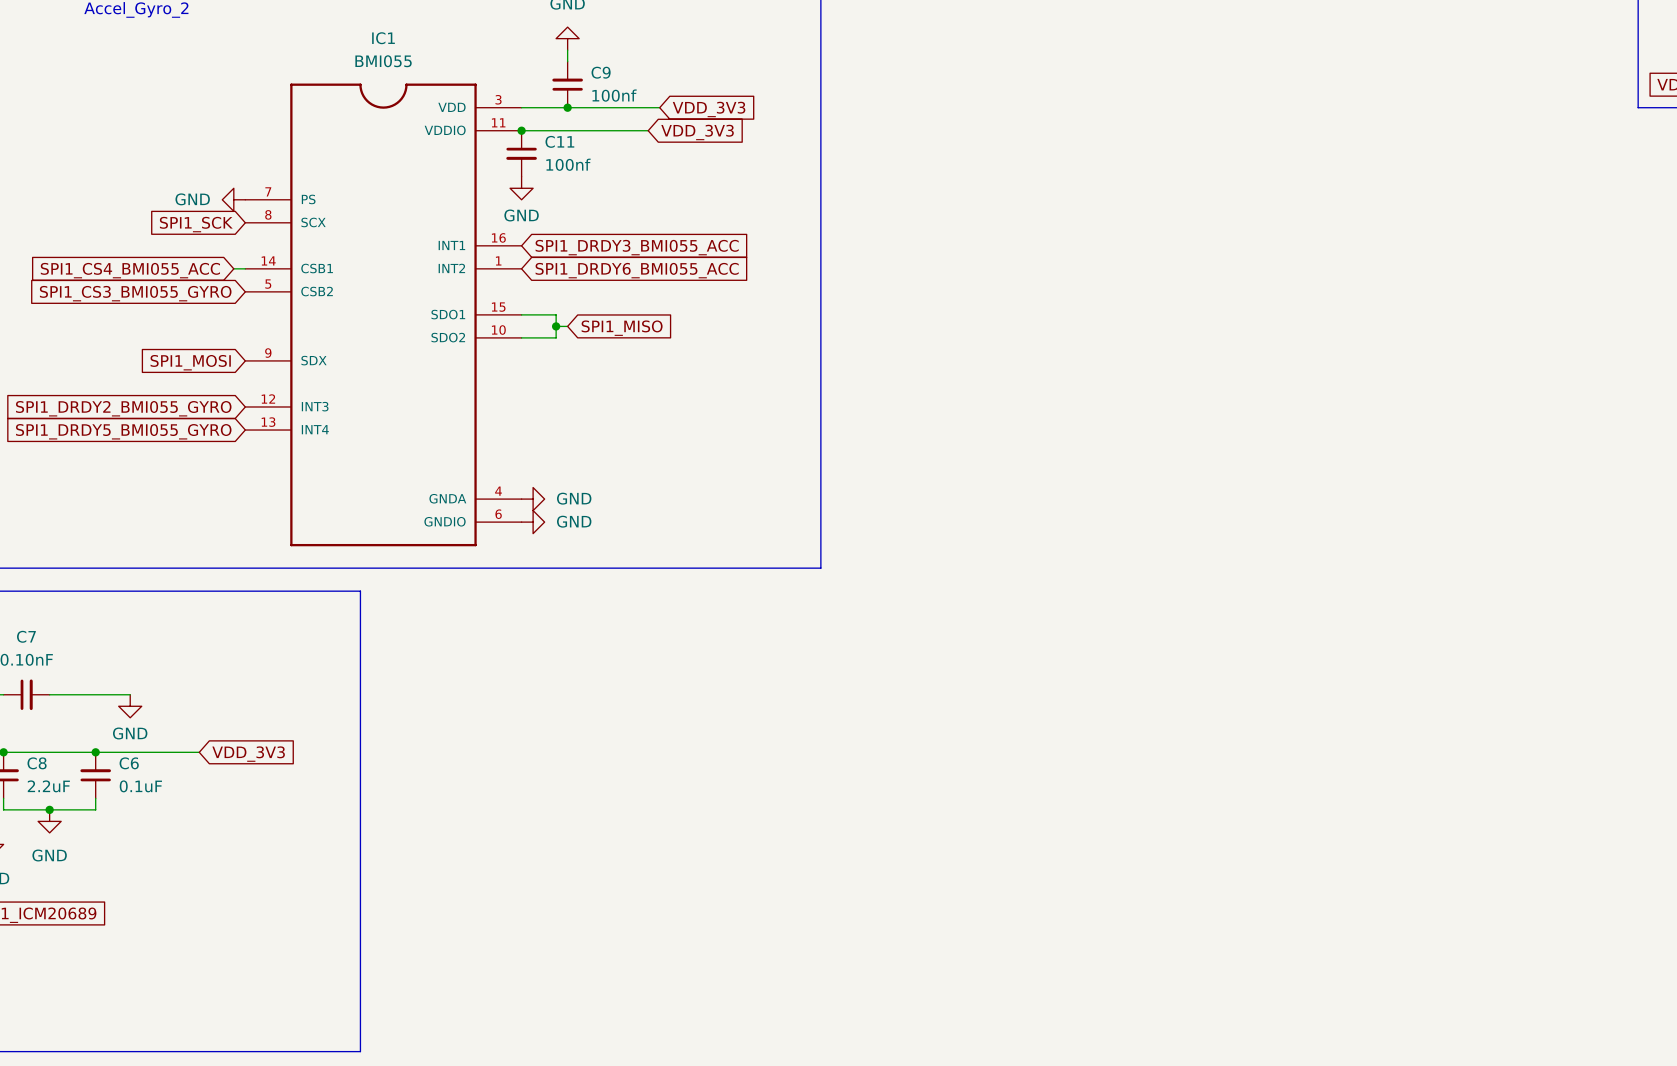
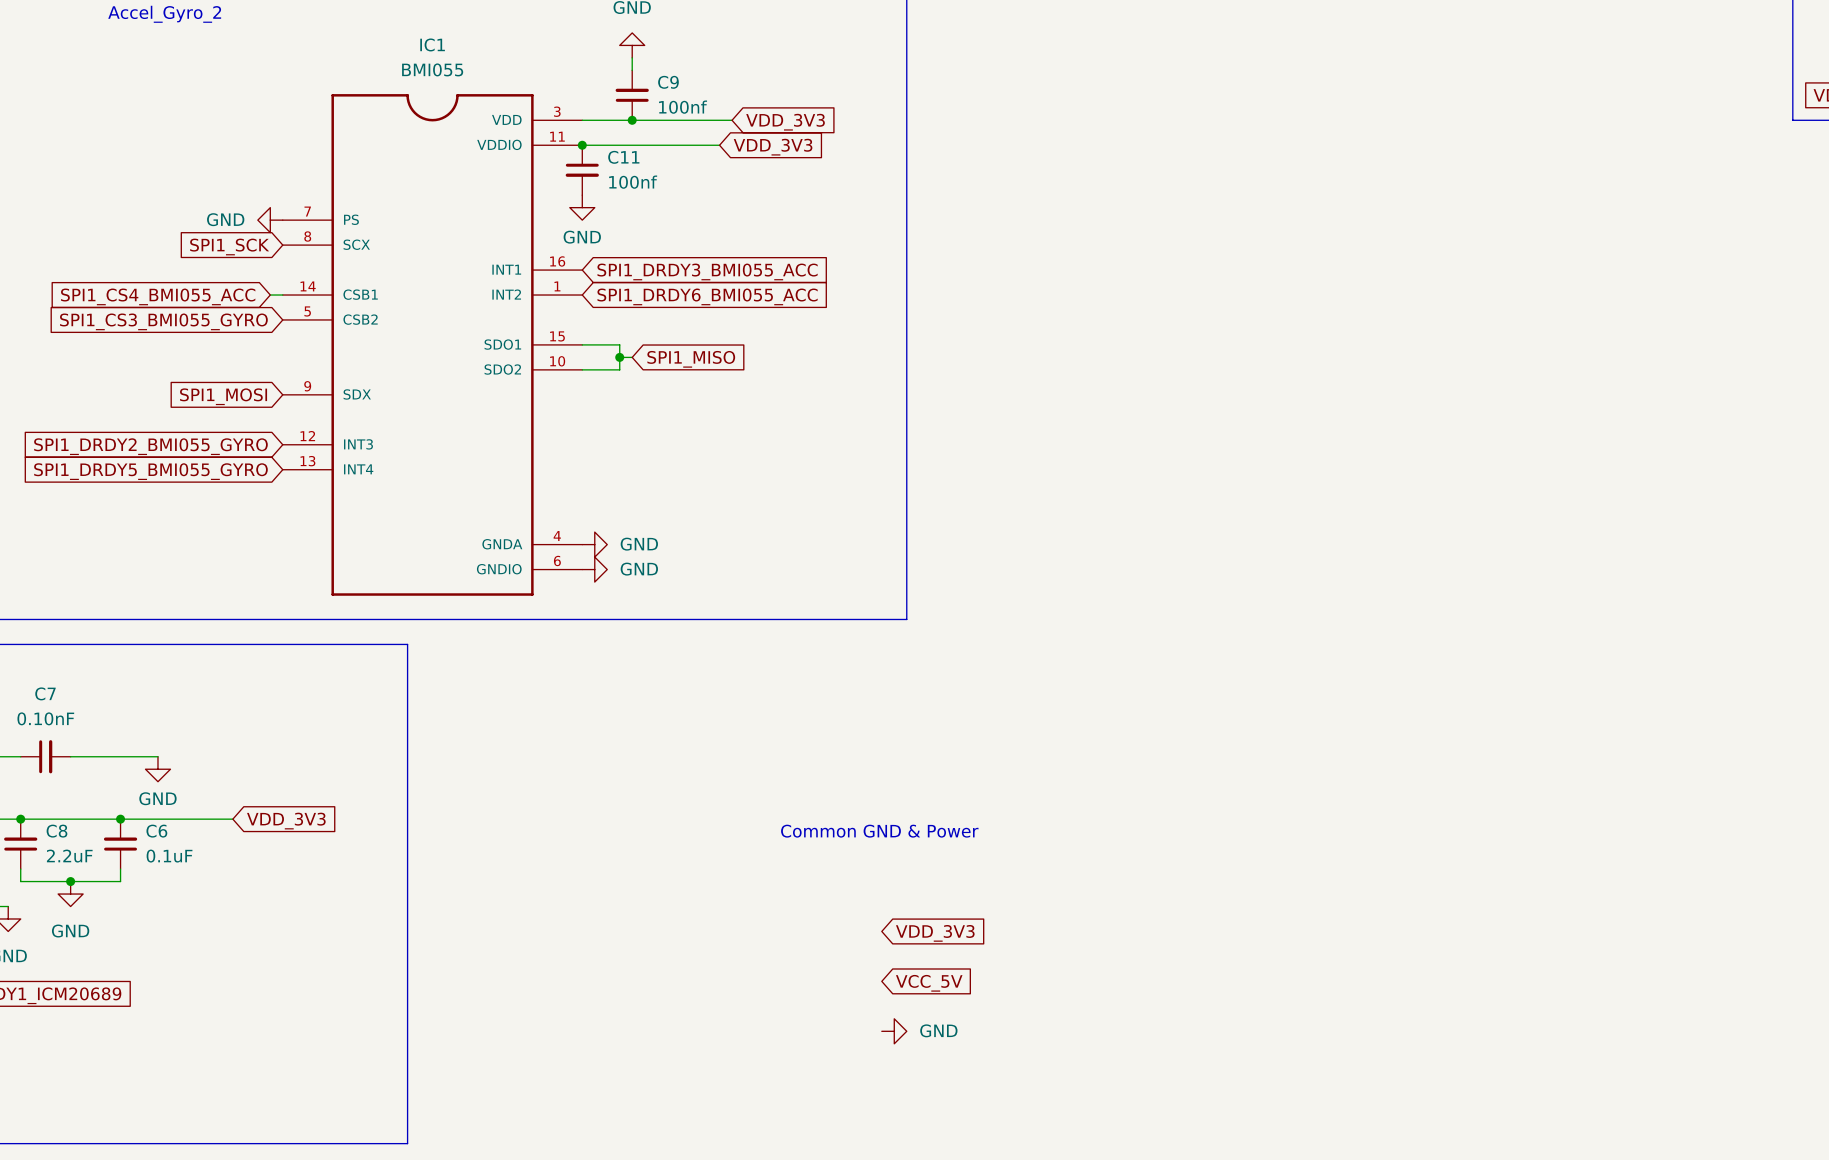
text: none -> Common GND & Power (879, 831)
global label: none -> VDD_3V3 (935, 933)
global label: none -> VCC_5V (929, 983)
power symbol: none -> GND (894, 1031)

